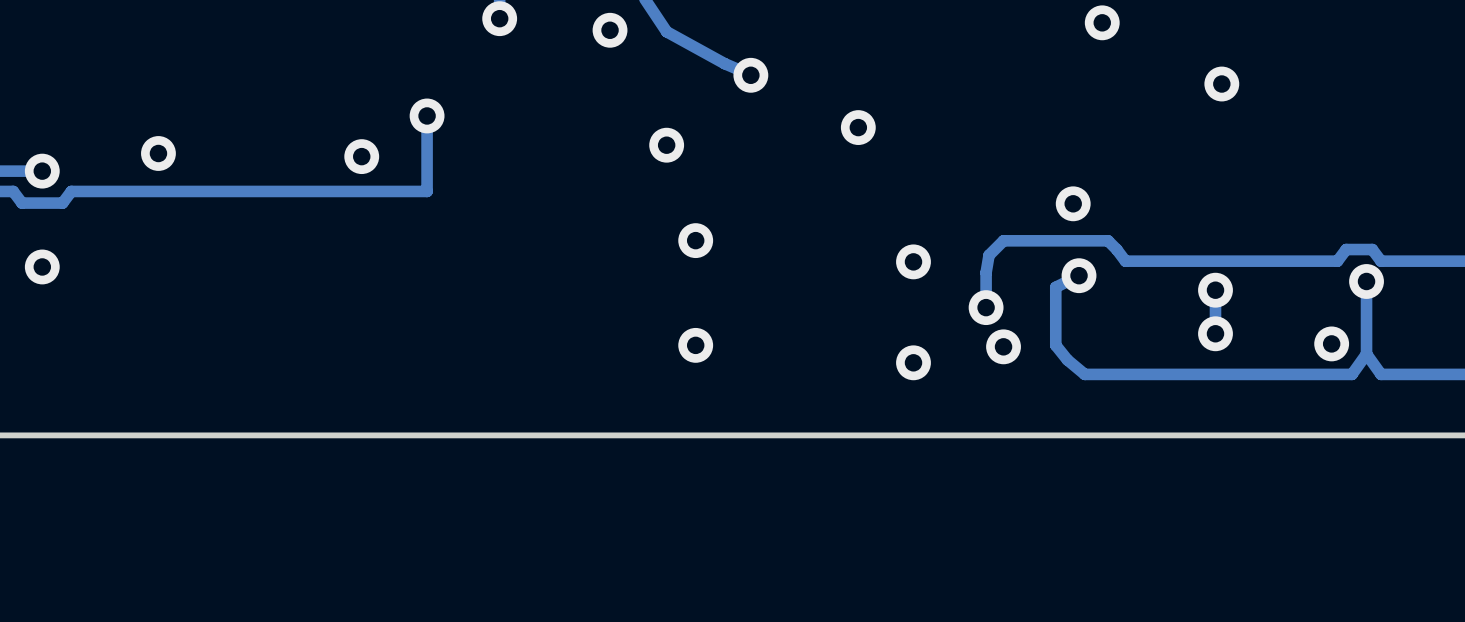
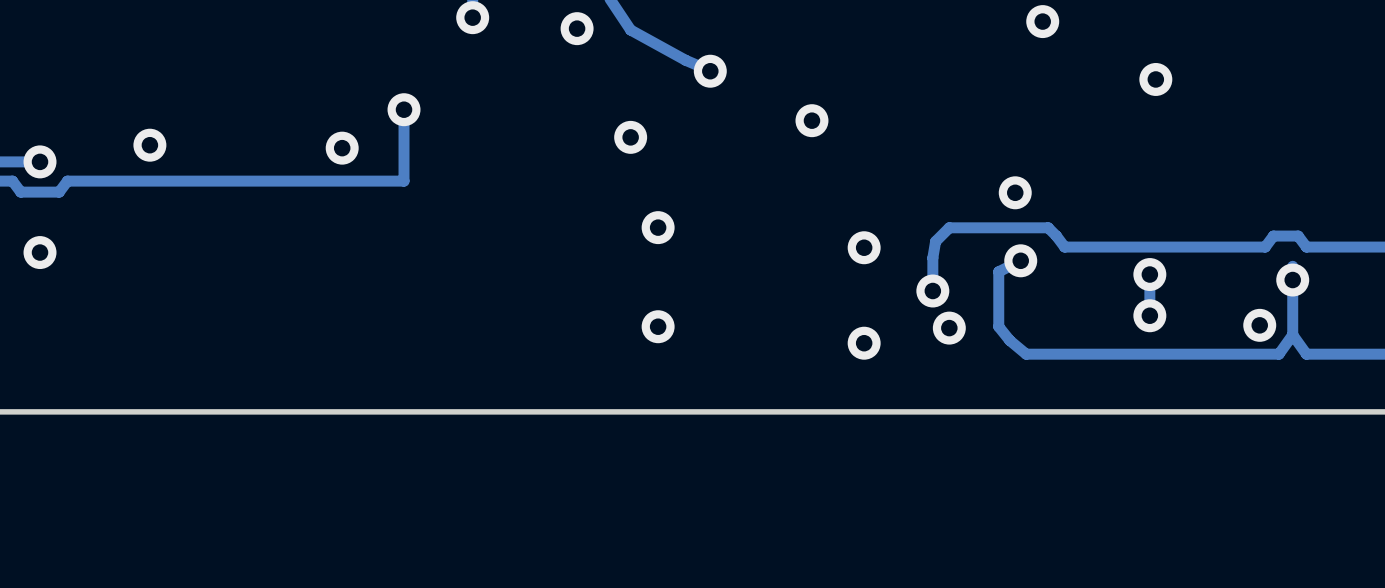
via position: (1366, 281) -> (1292, 280)

